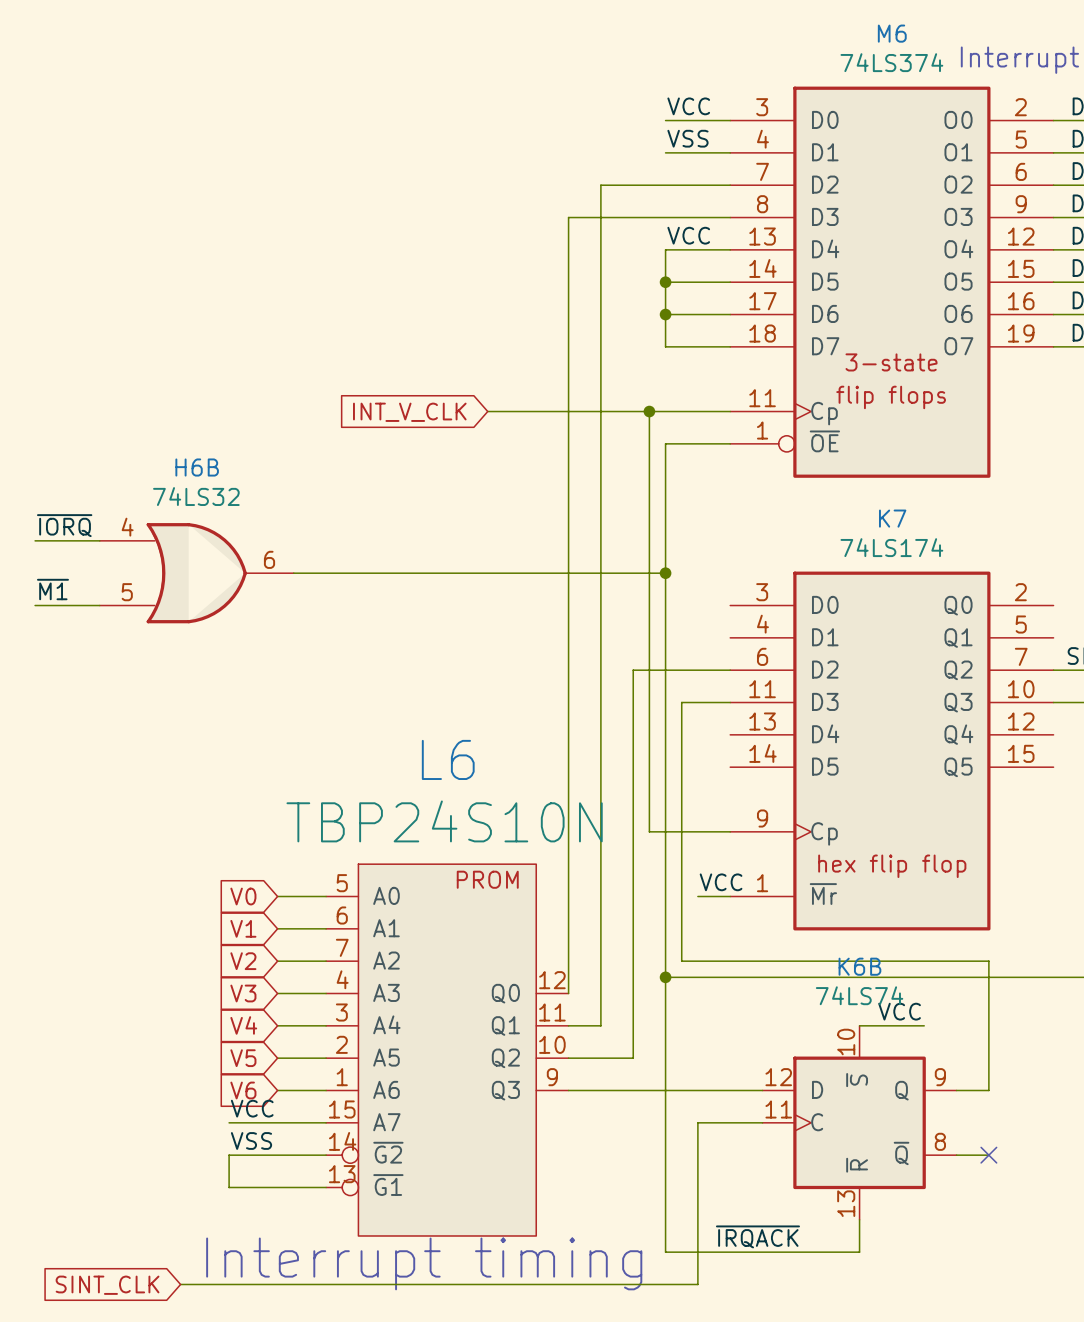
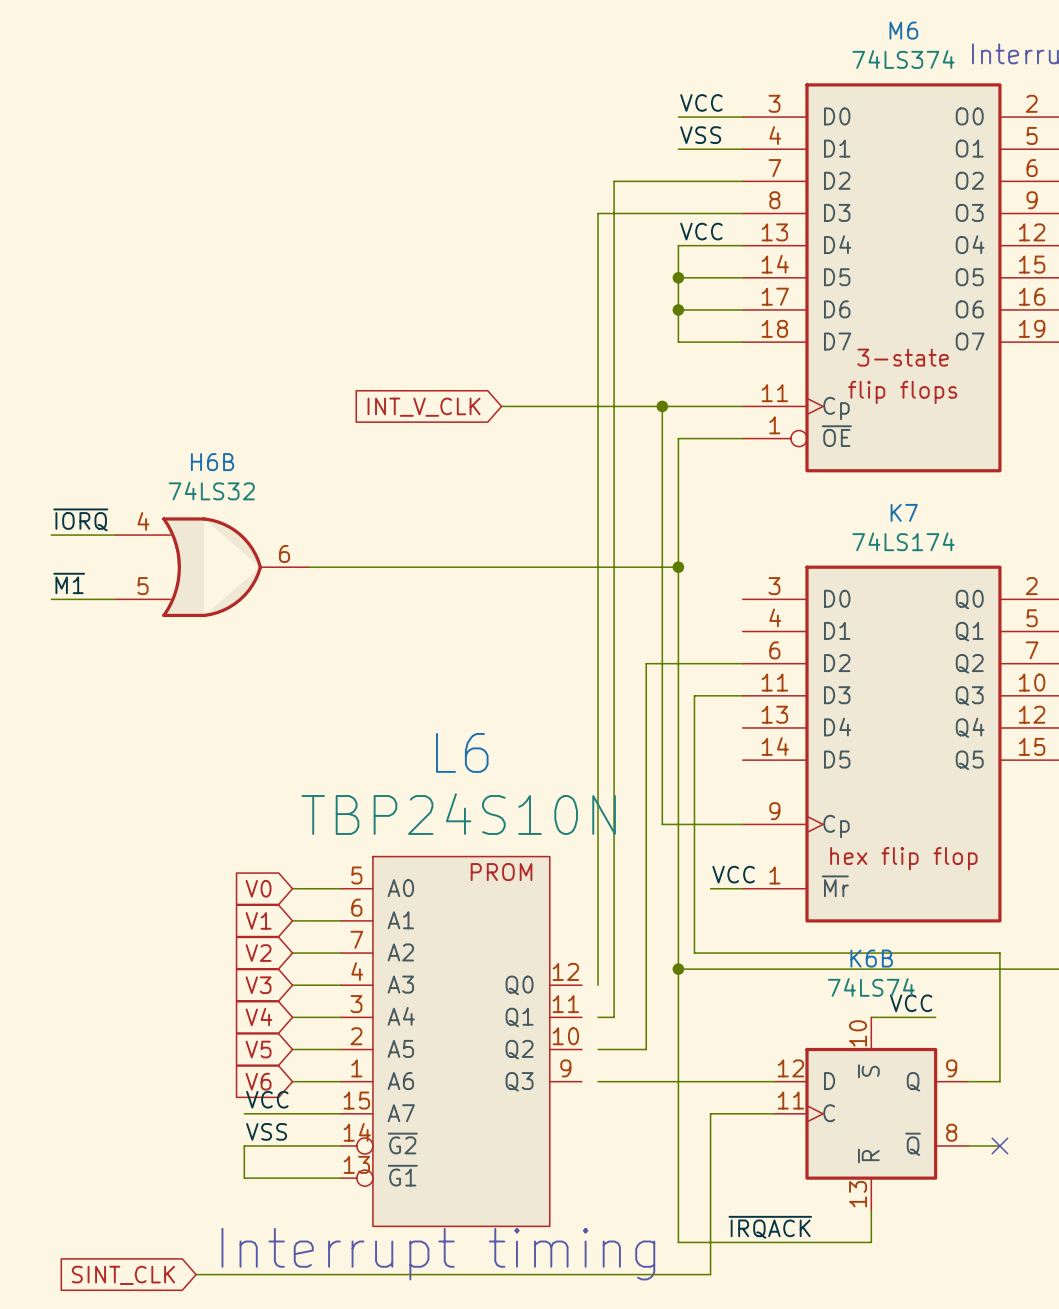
wire: (584, 217) (568, 217) (568, 993) -> (598, 213) (598, 985)
wire: (568, 1025) (584, 1025) -> none
wire: (568, 1058) (584, 1058) -> none
wire: (568, 1090) (584, 1090) -> none

